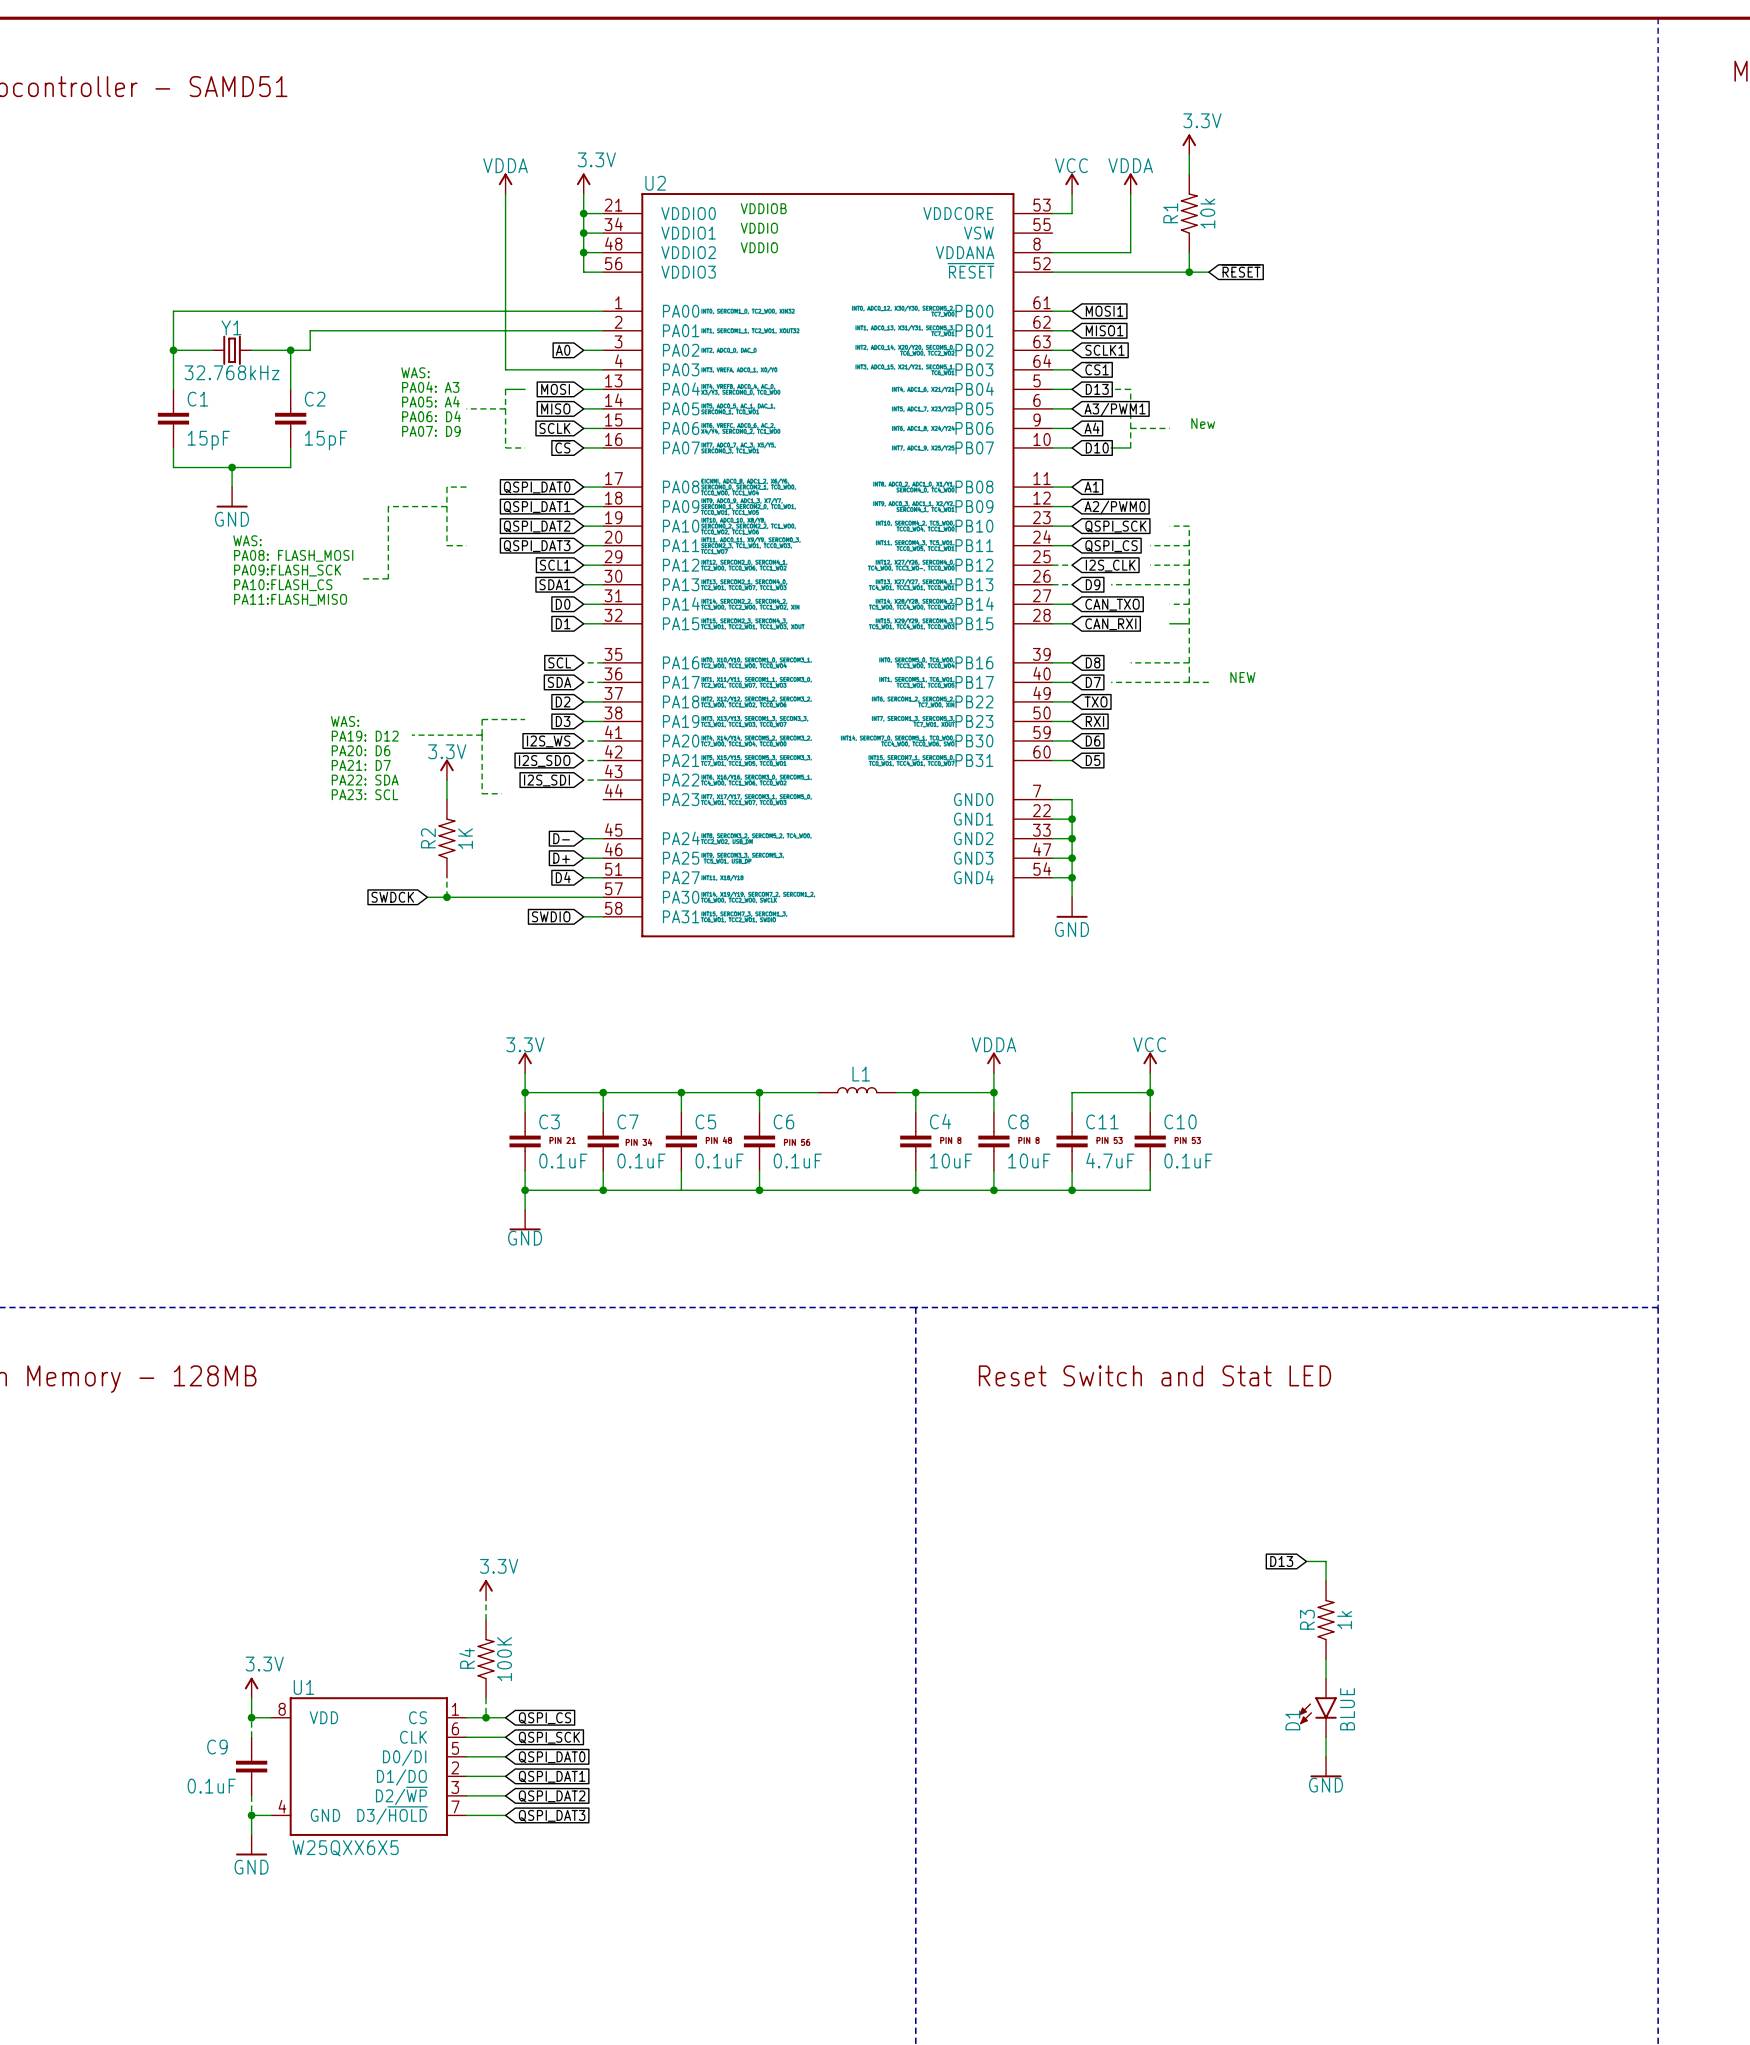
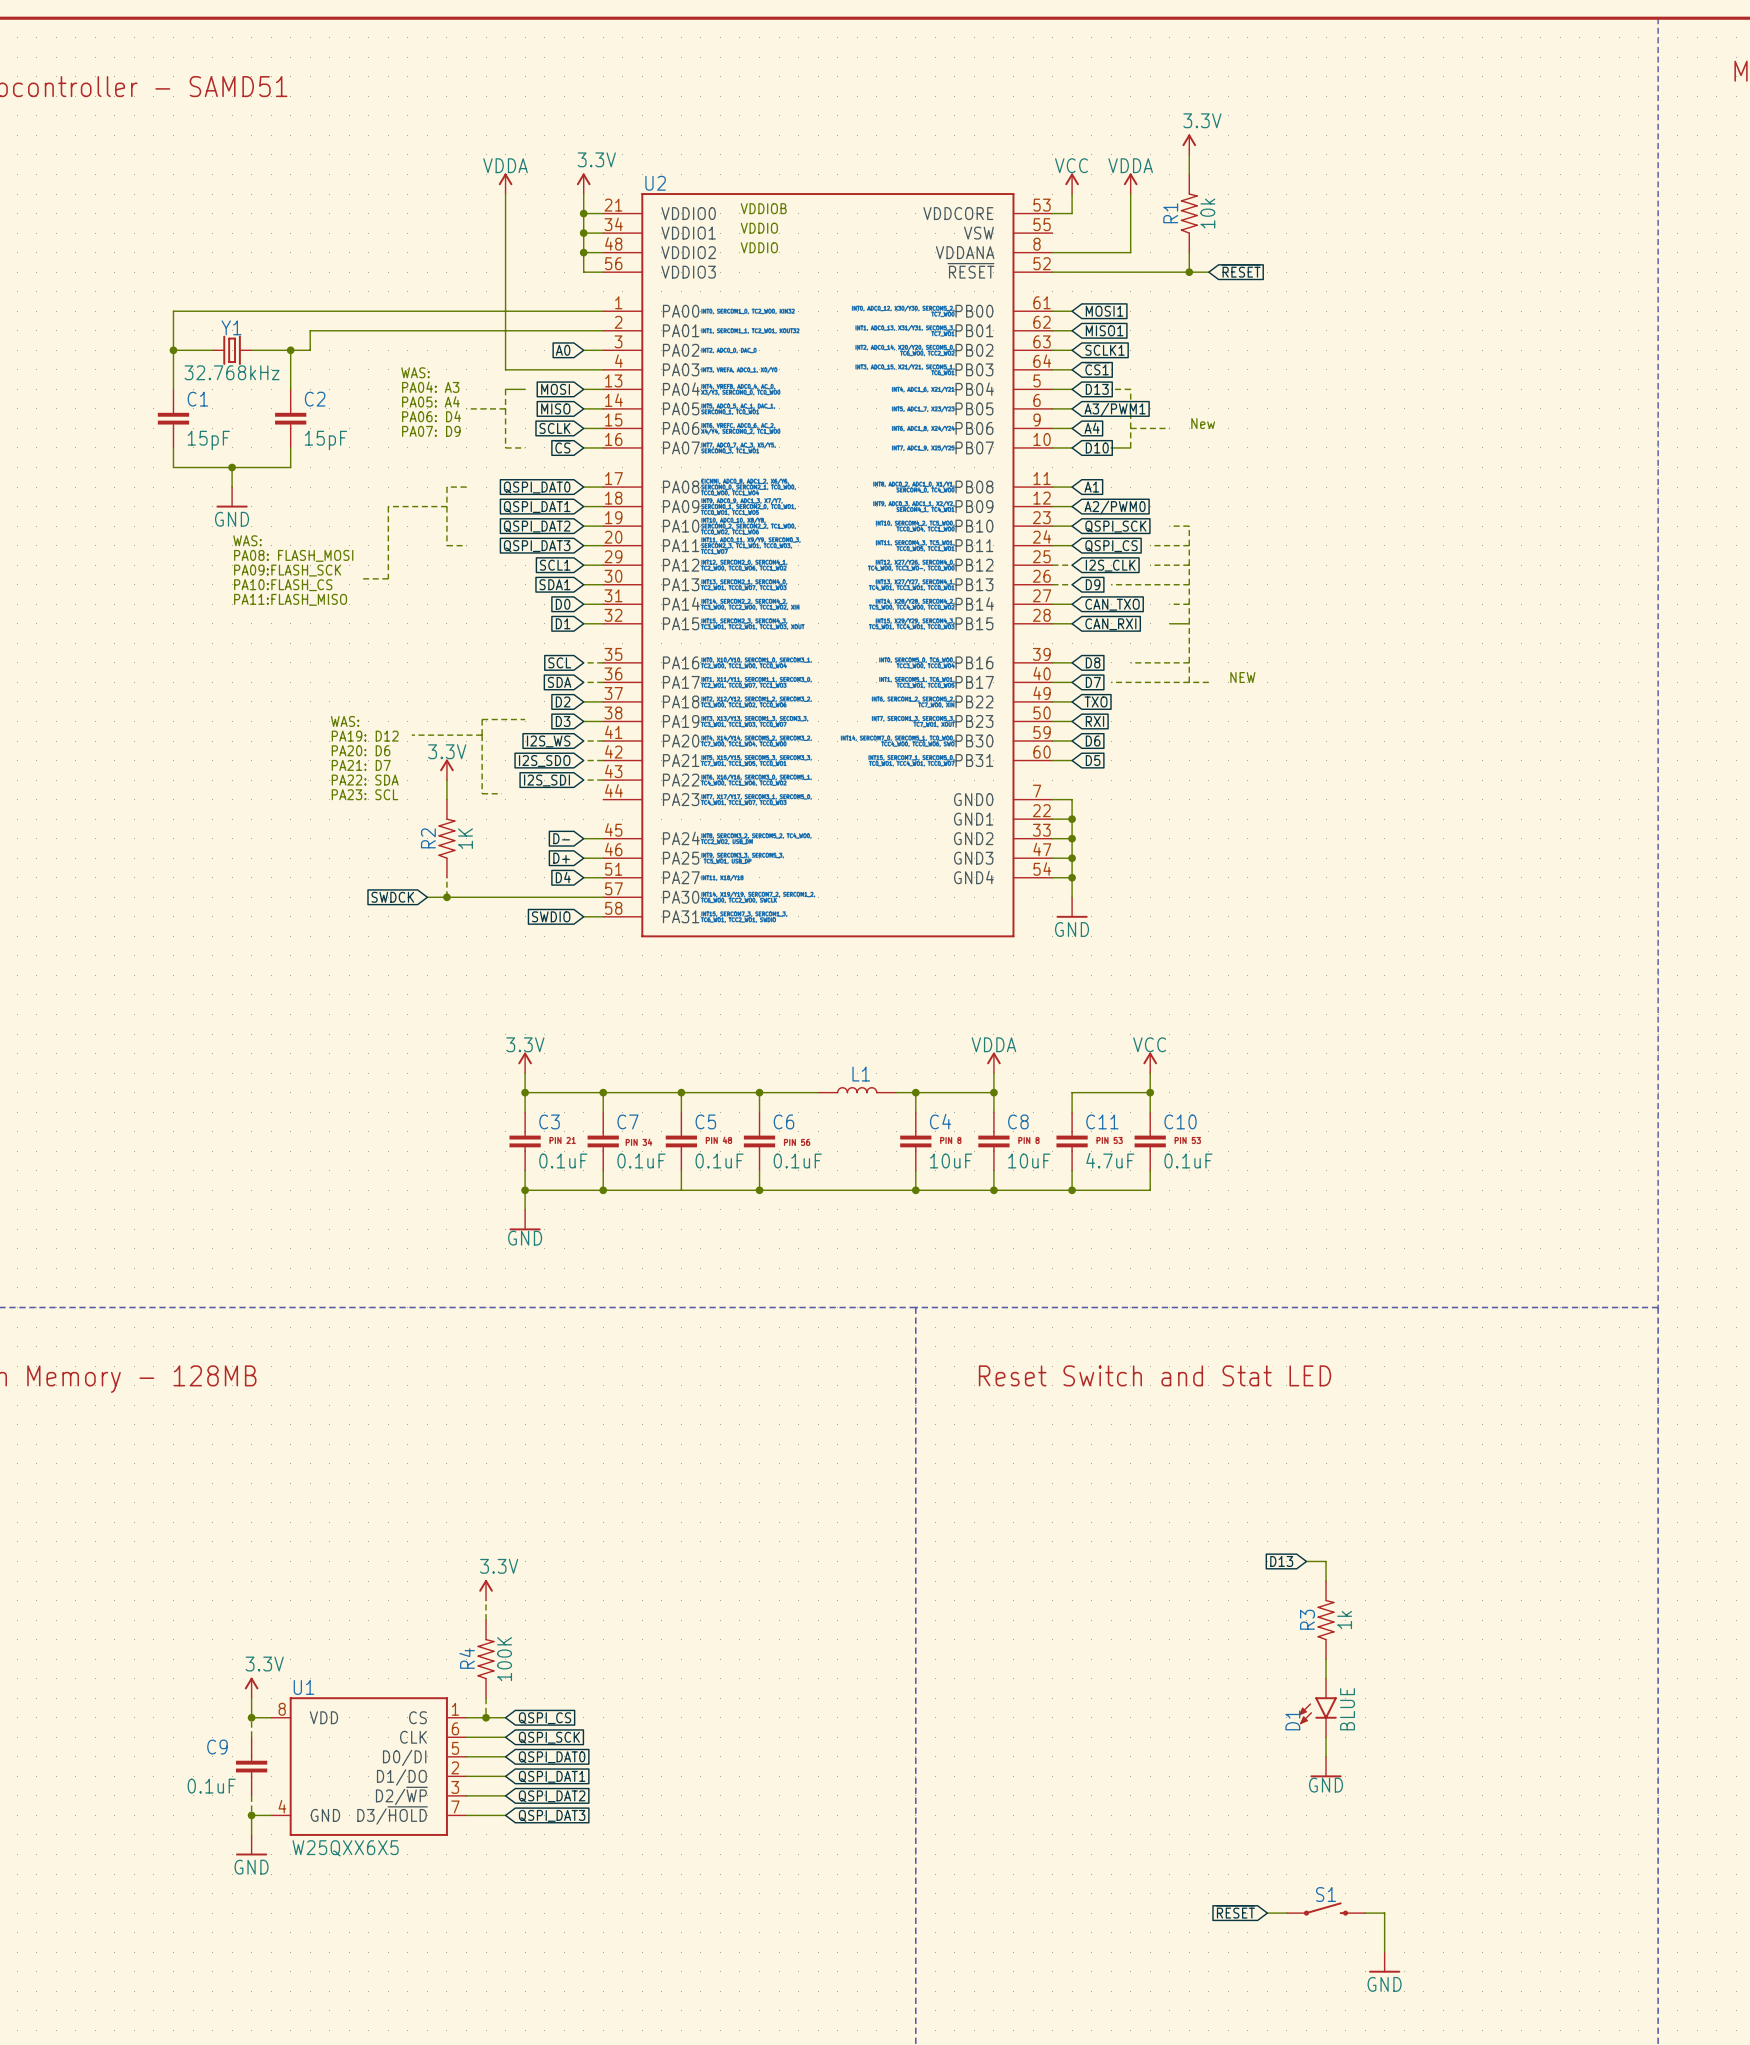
S1: none -> (1326, 1908)
global label: none -> ~{RESET} (1235, 1911)
wire: none -> (1267, 1913) (1286, 1913)
wire: none -> (1365, 1913) (1384, 1913) (1384, 1952)
power symbol: none -> GND (1384, 1962)

